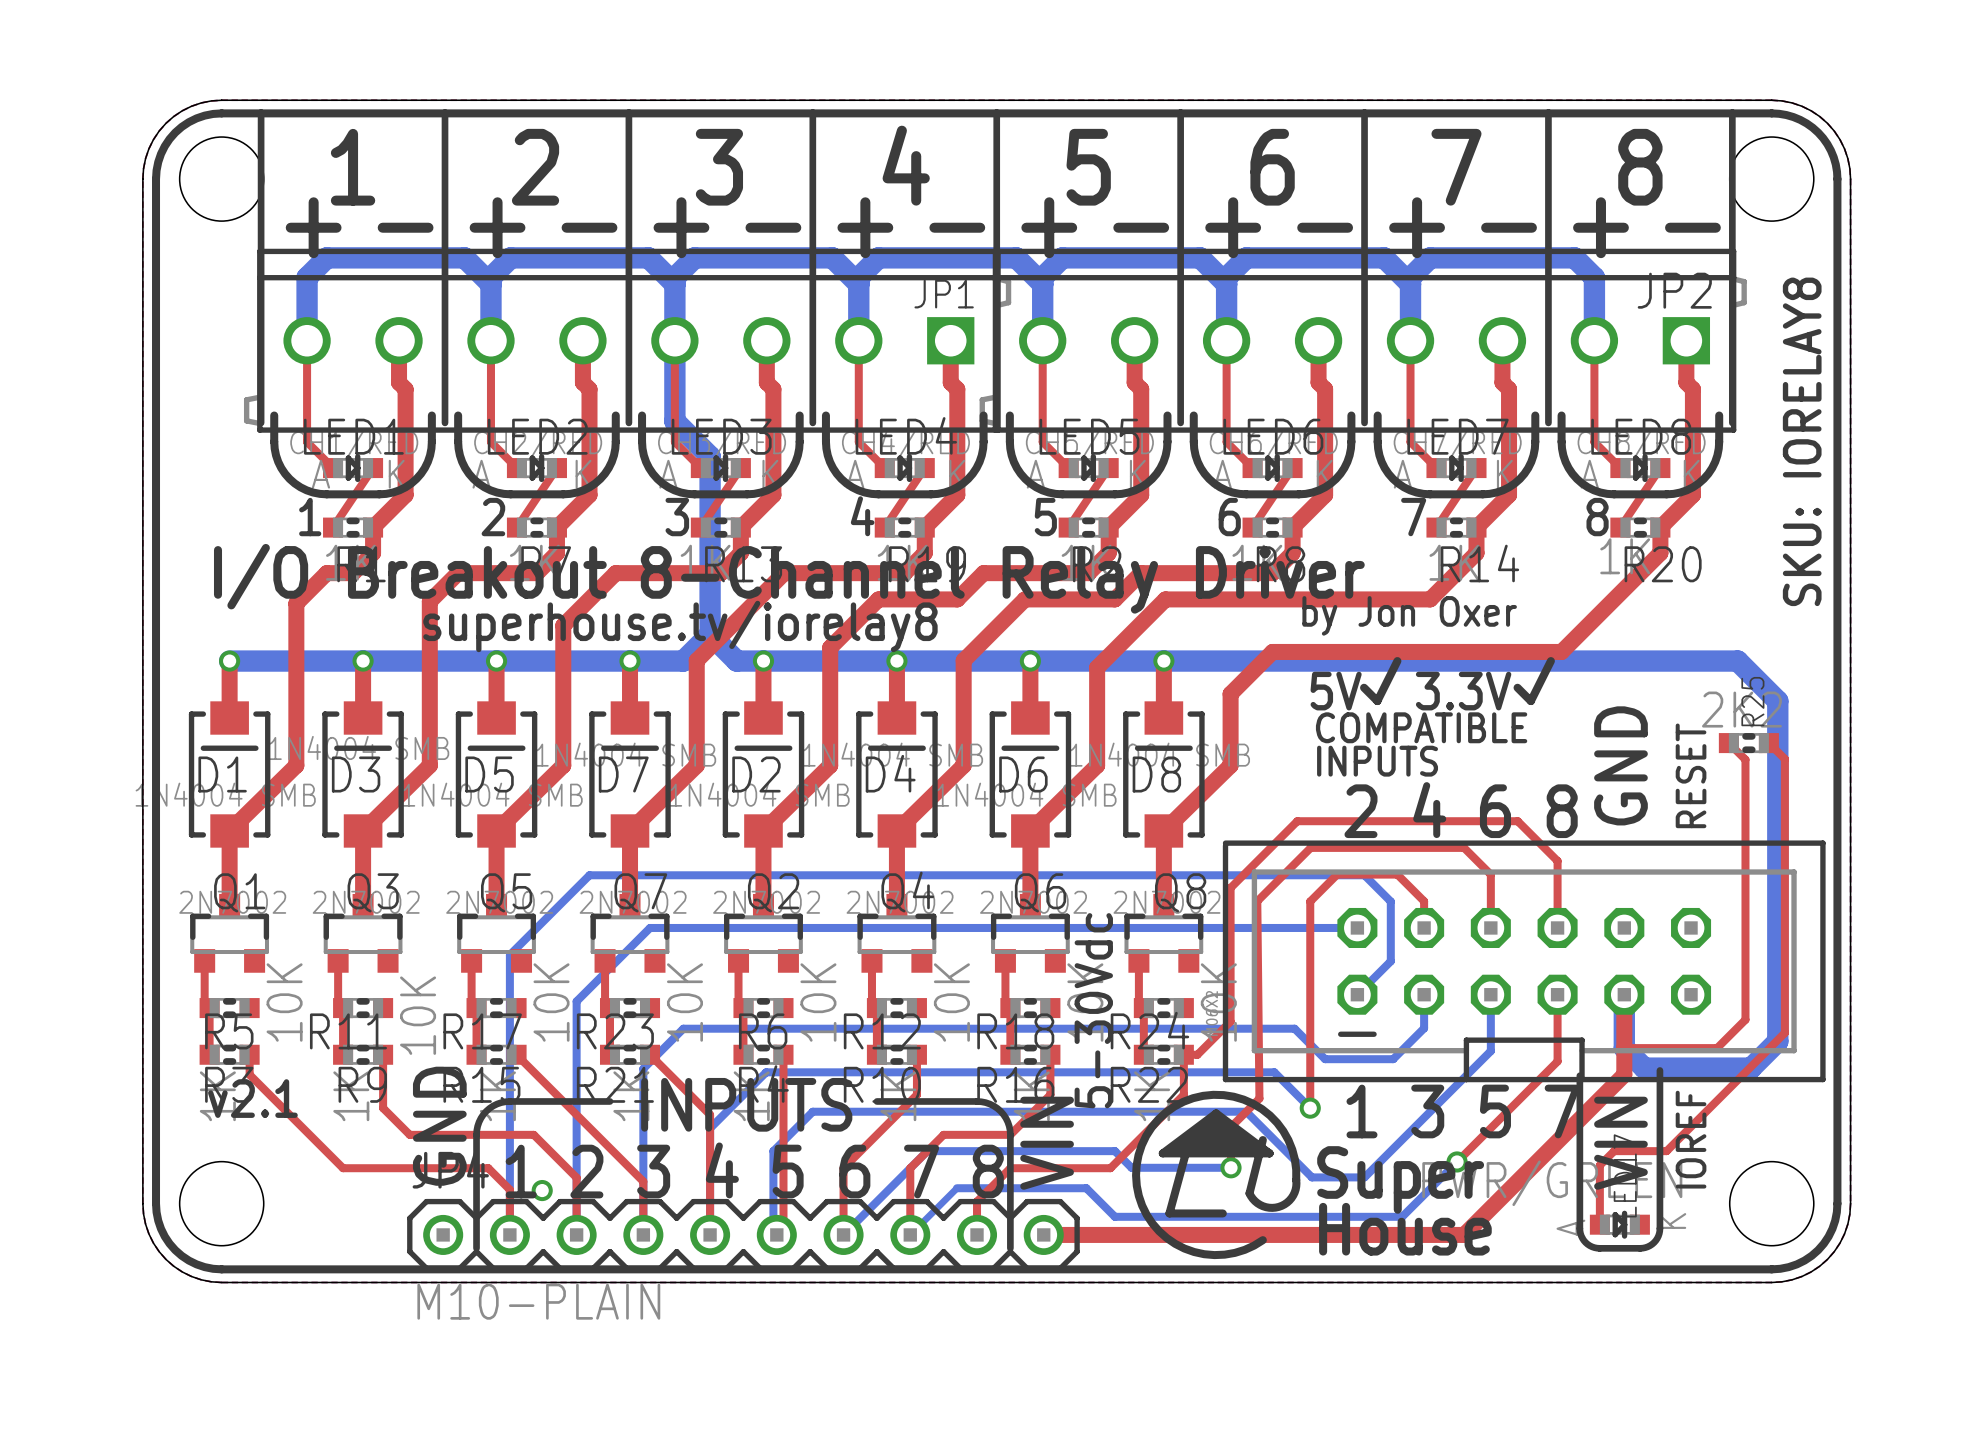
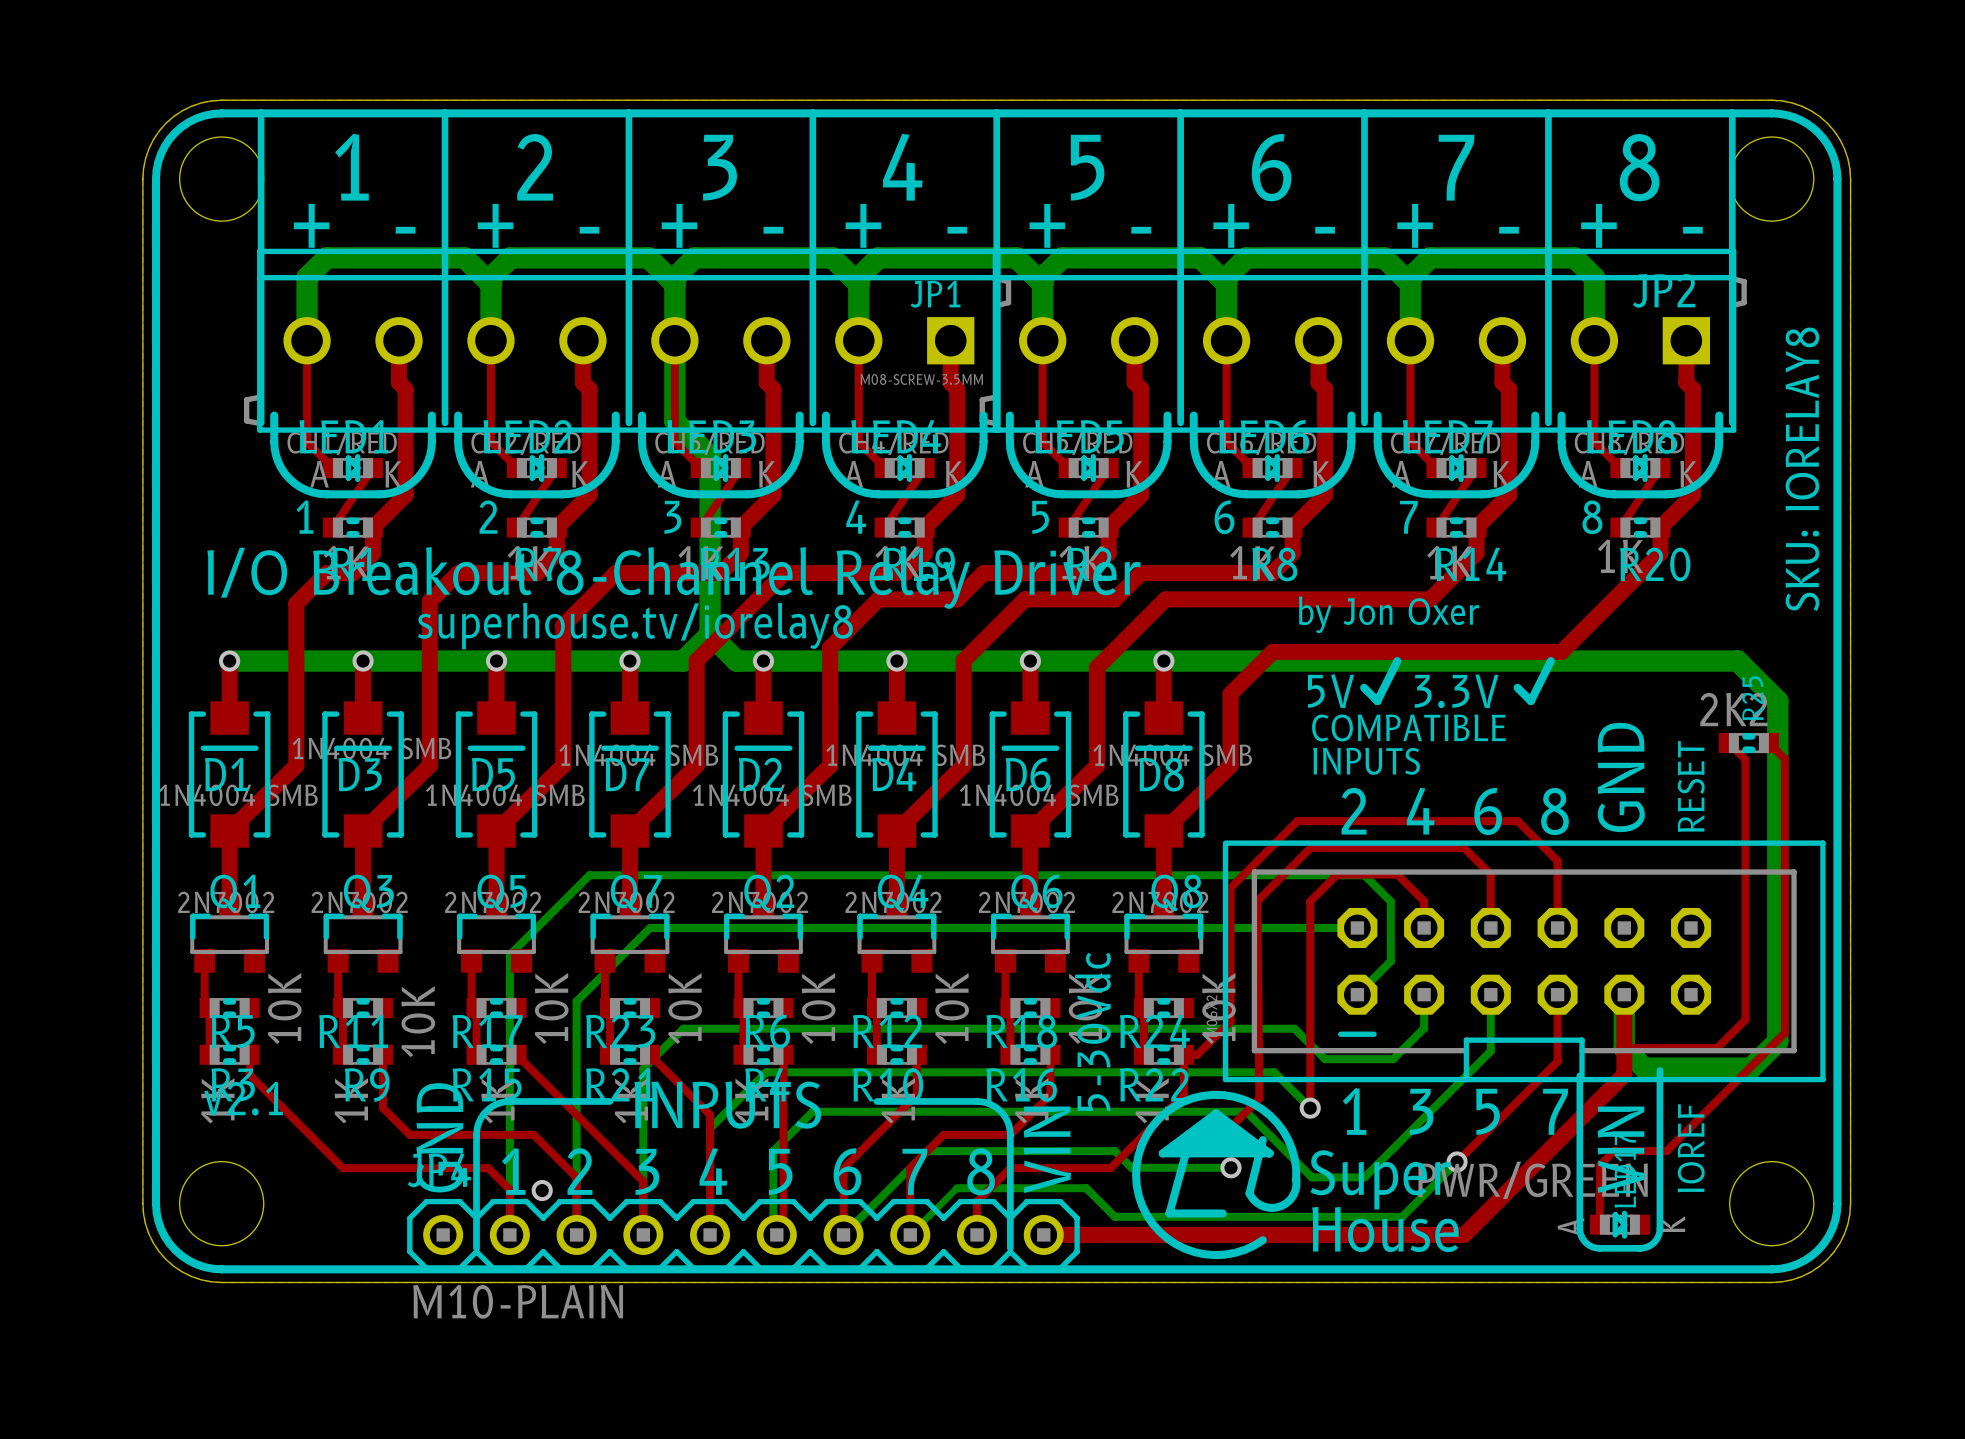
JP1 value: none -> M08-SCREW-3.5MM (921, 379)

